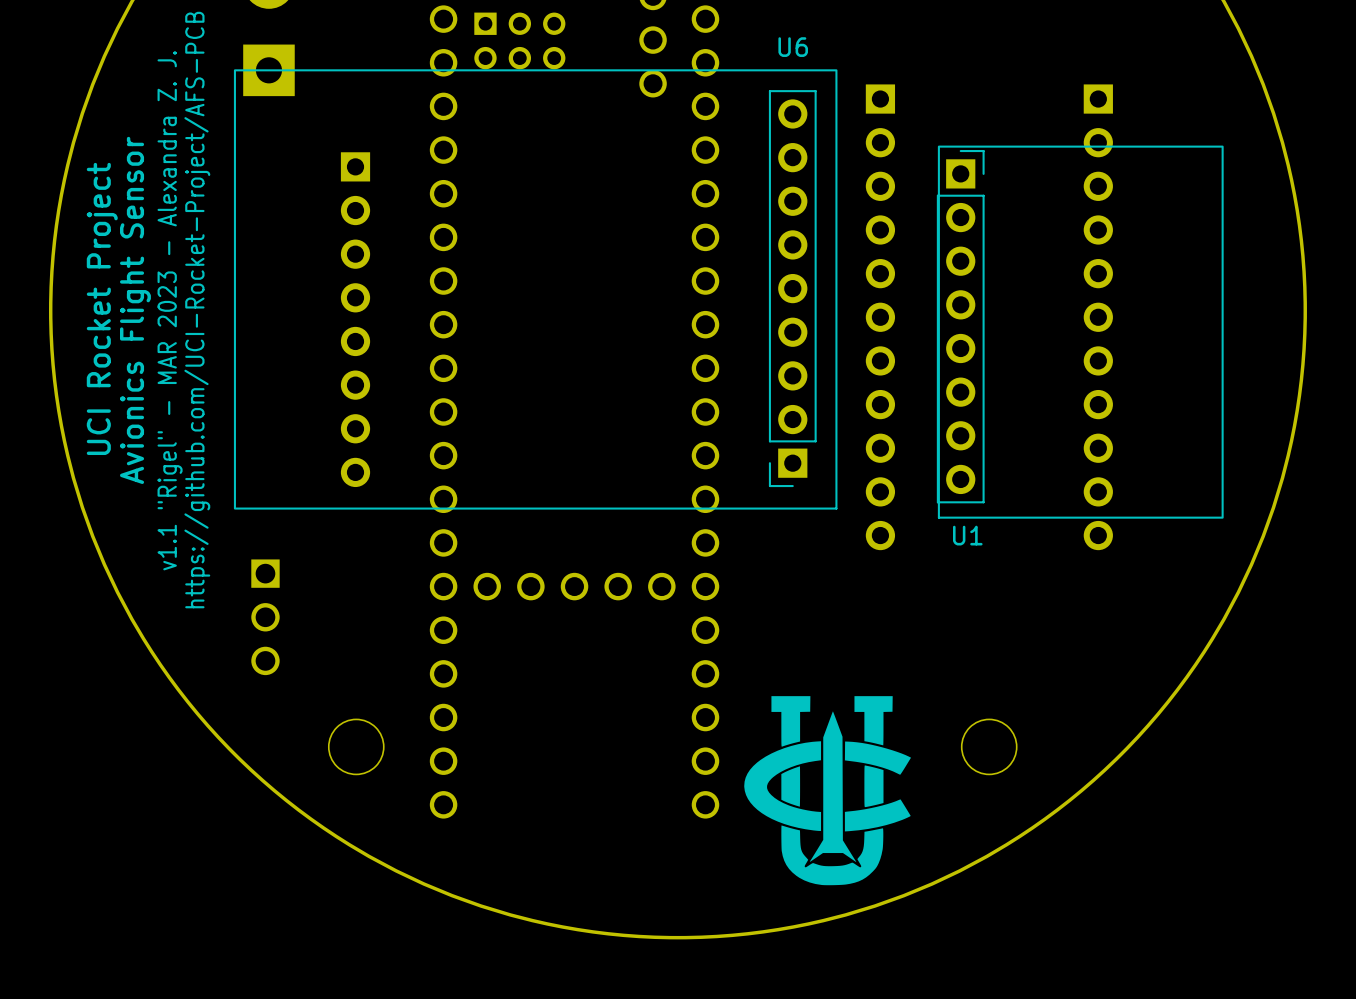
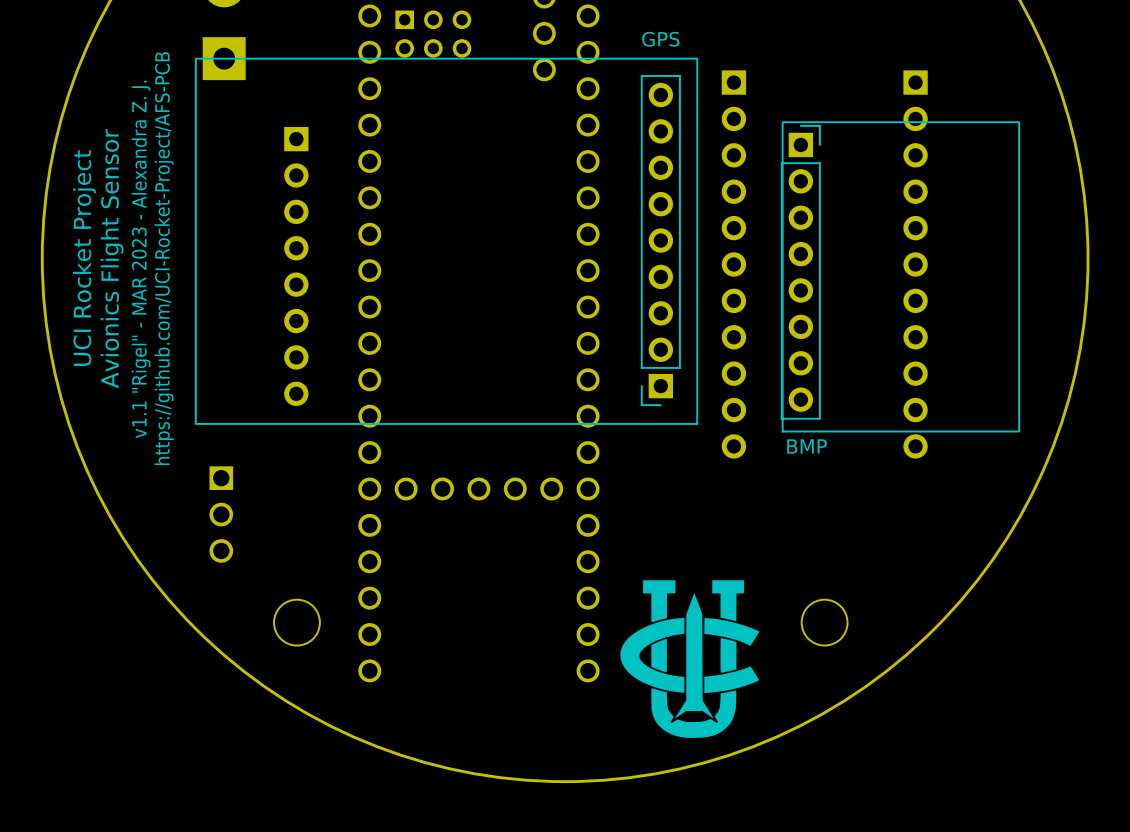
U6 name: U6 (793, 47) -> GPS (660, 39)
U1 name: U1 (967, 535) -> BMP (807, 446)

